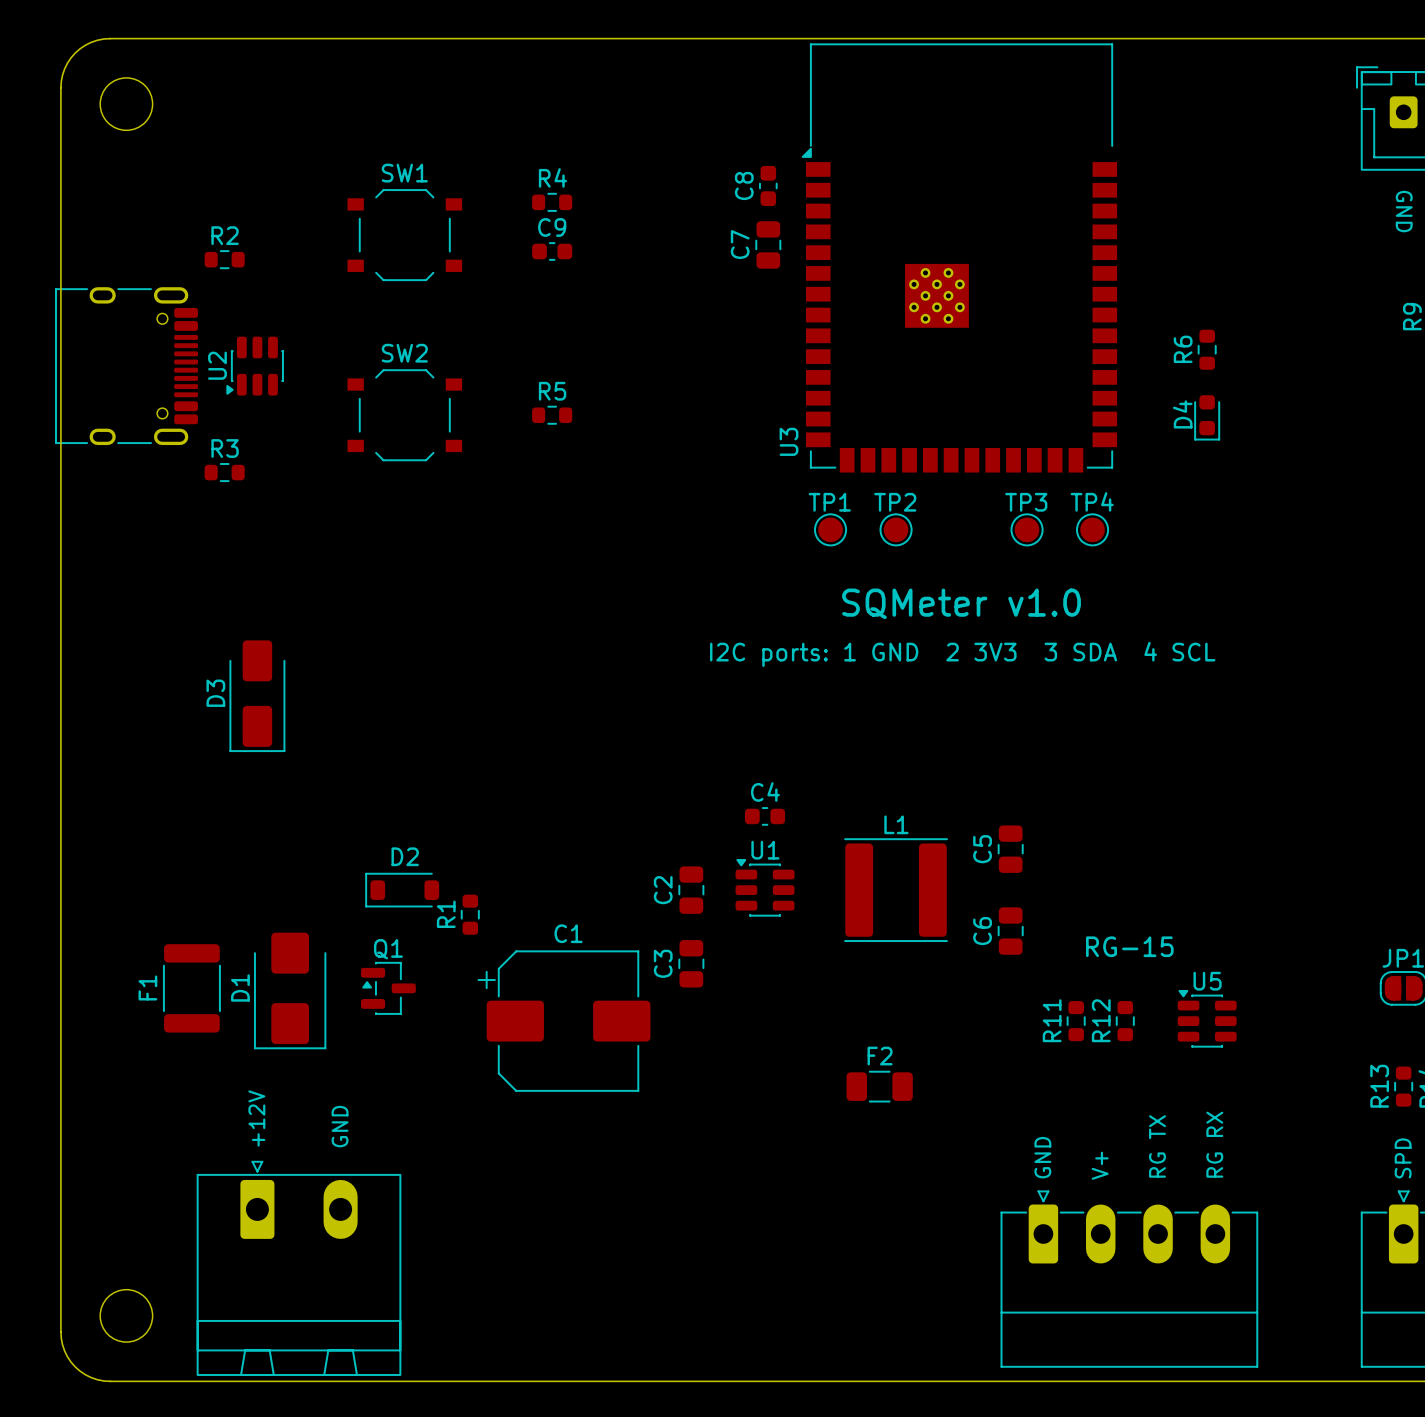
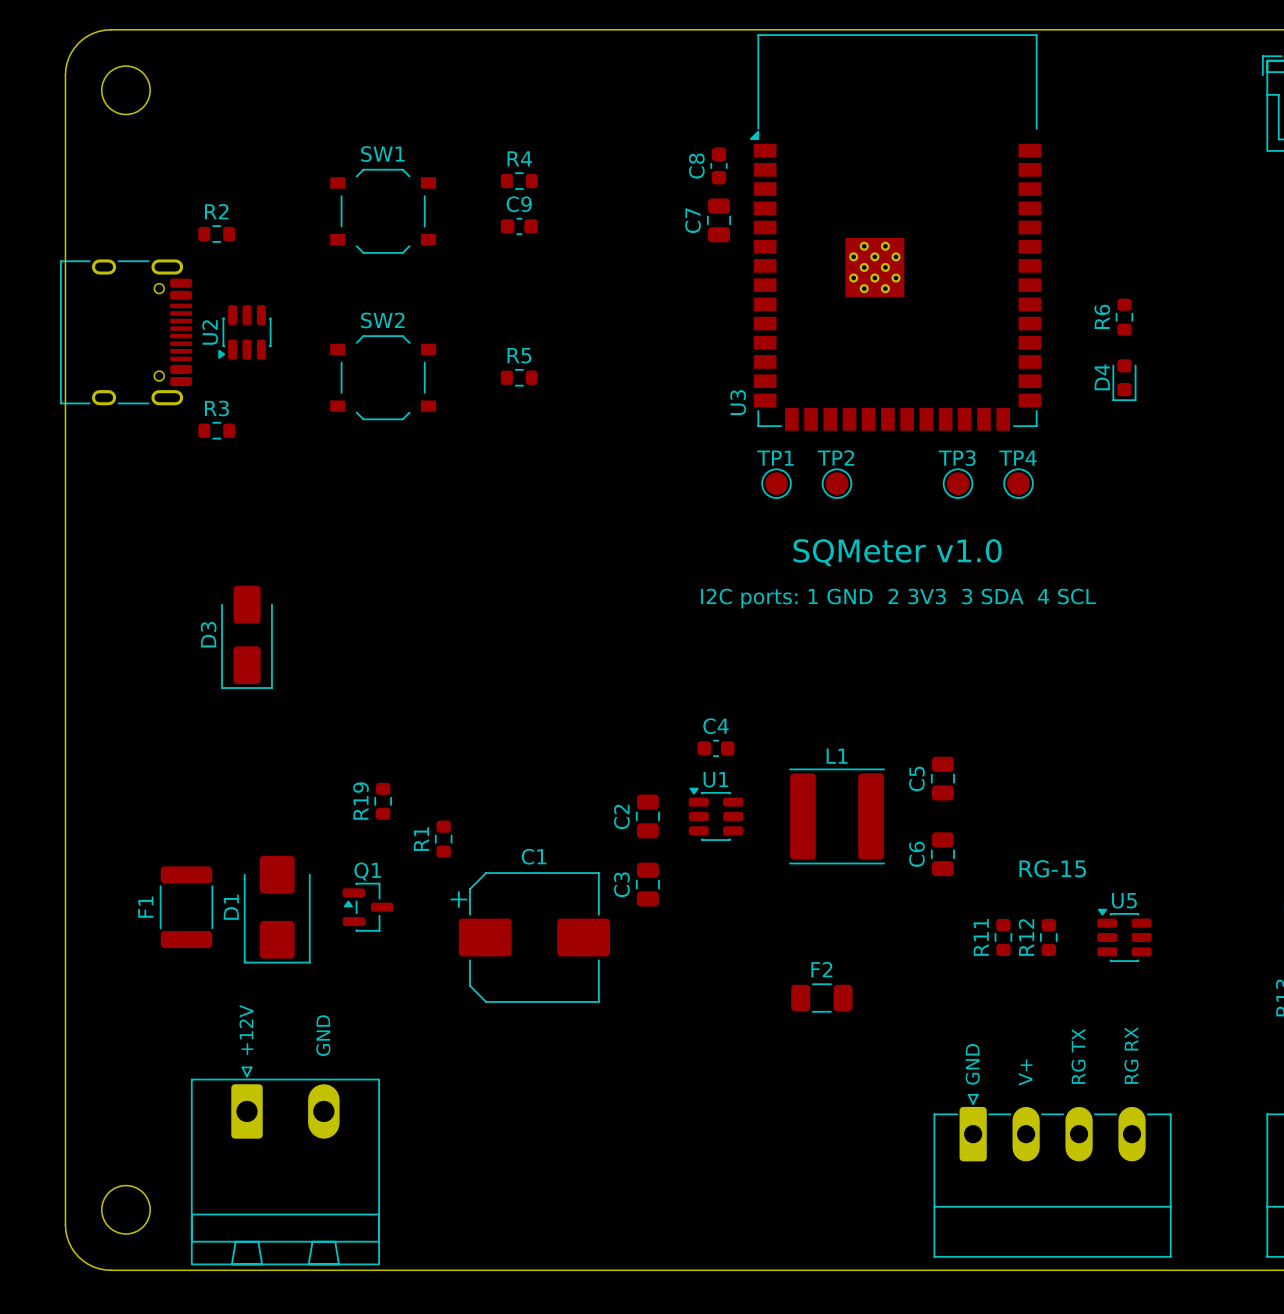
R19: none -> (383, 801)
D2: (402, 890) -> none

